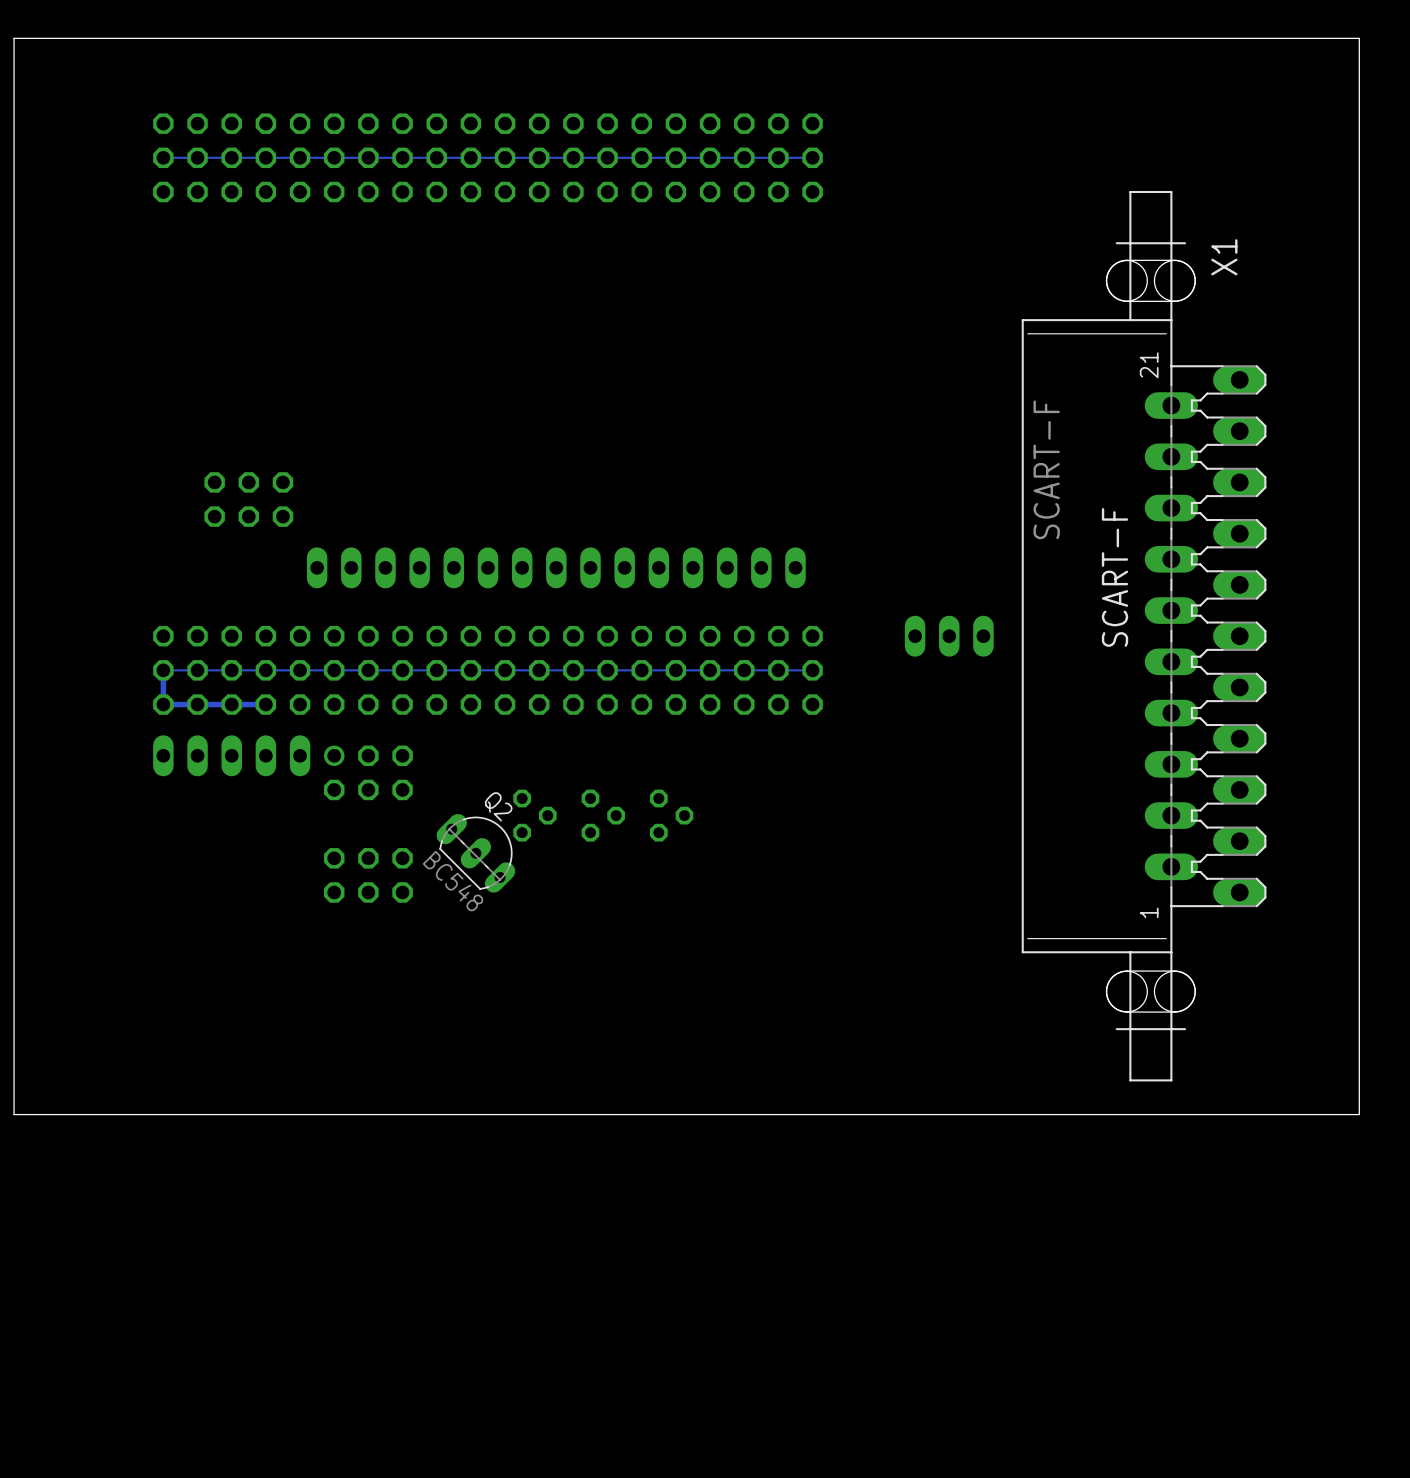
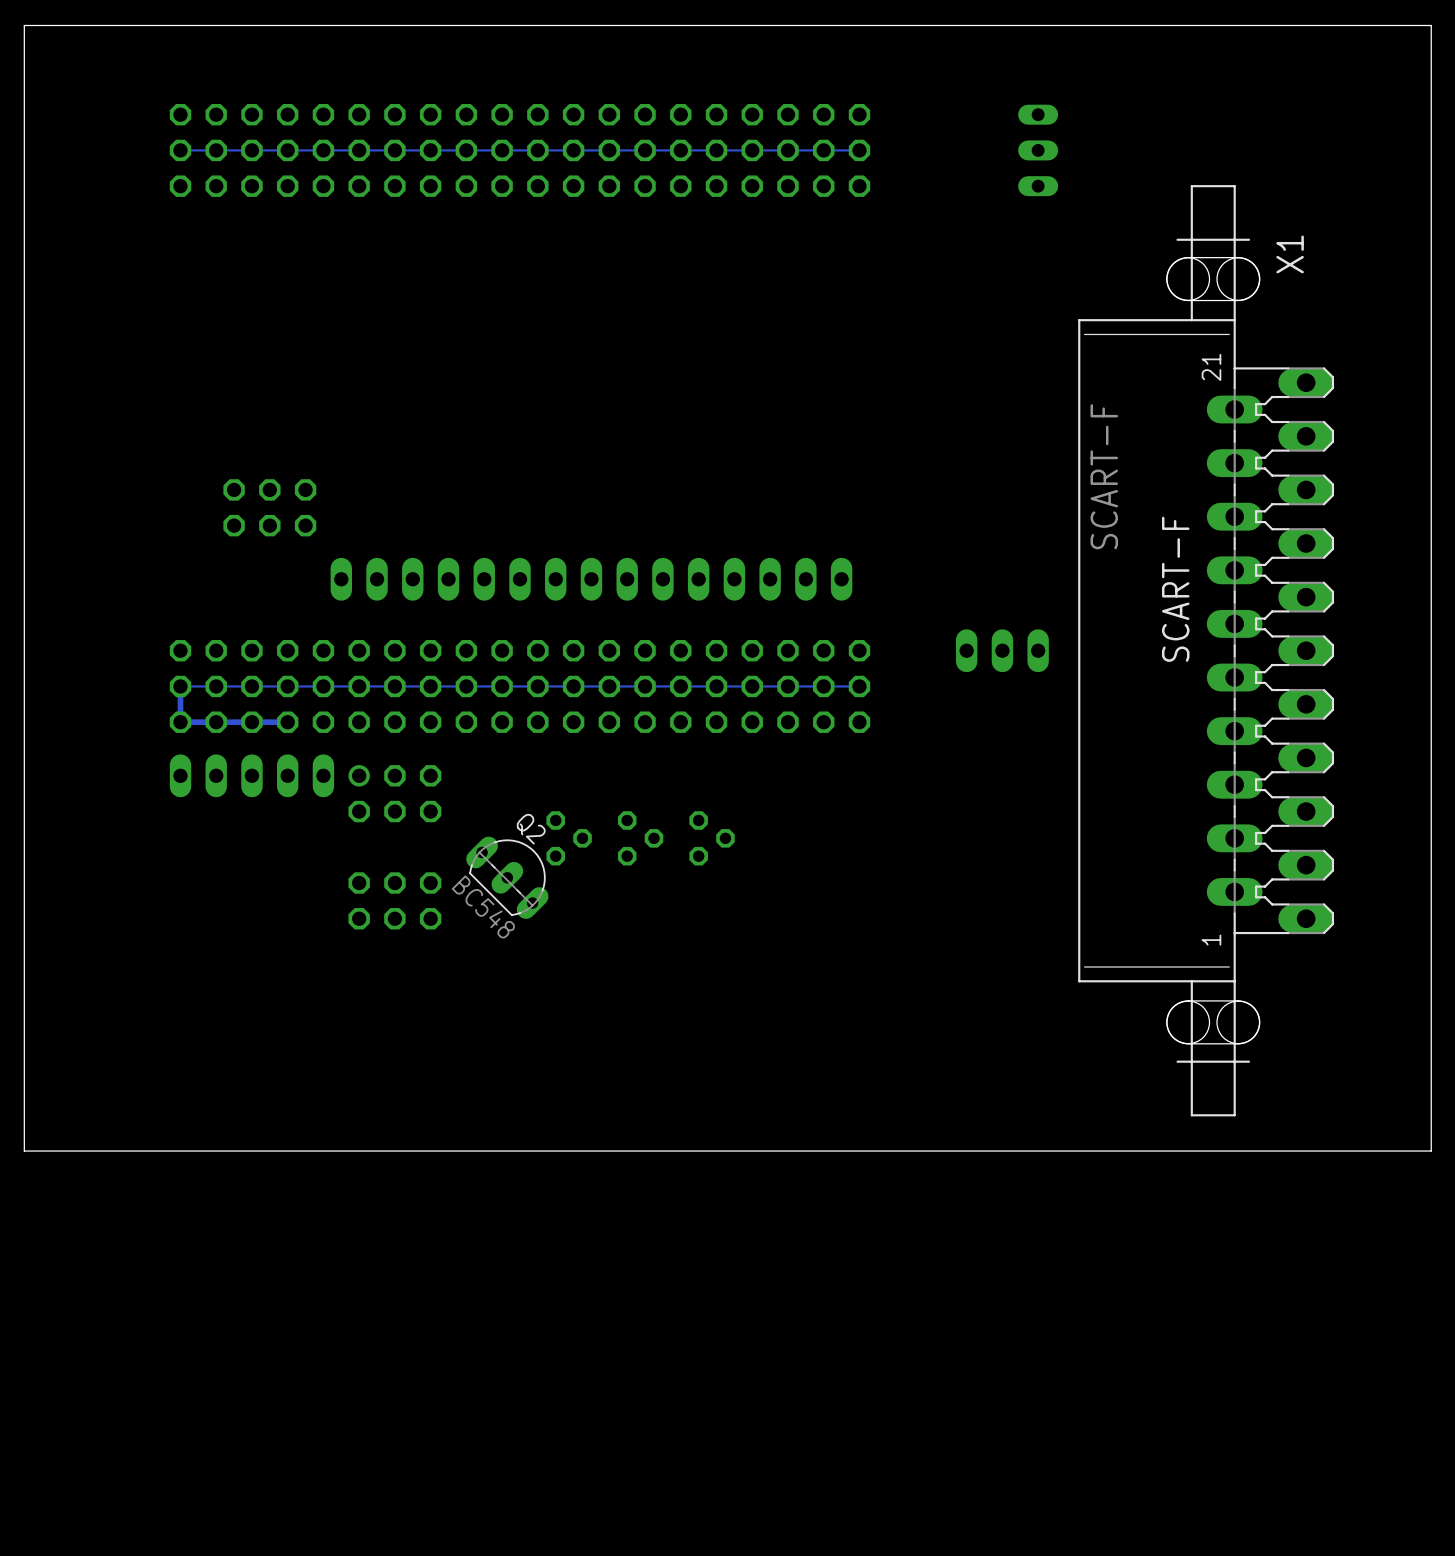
part: none -> (1038, 150)

